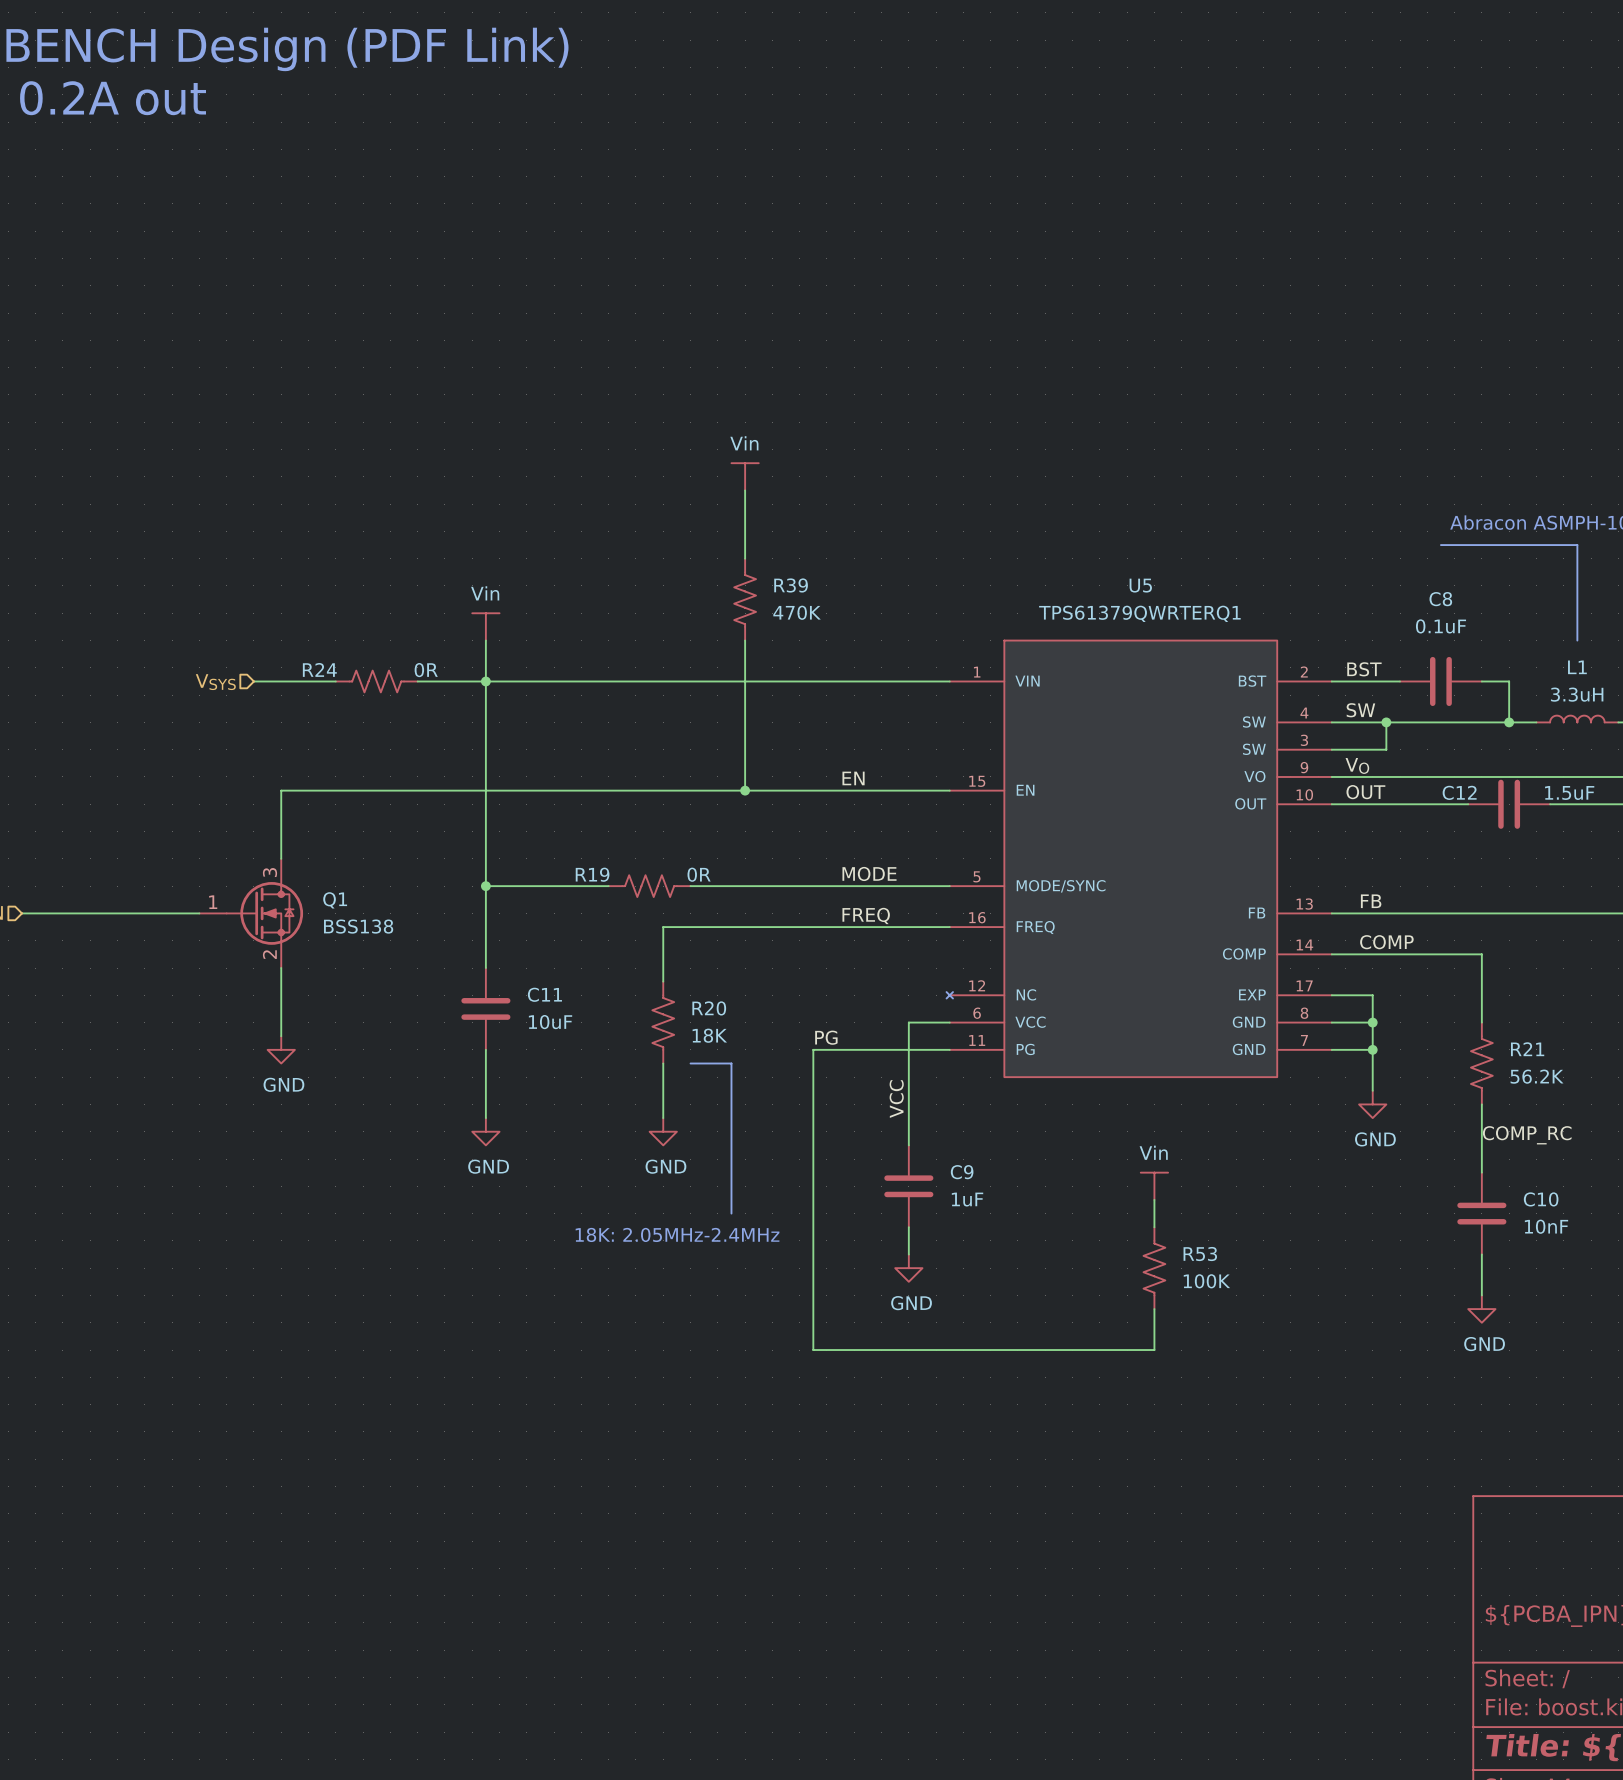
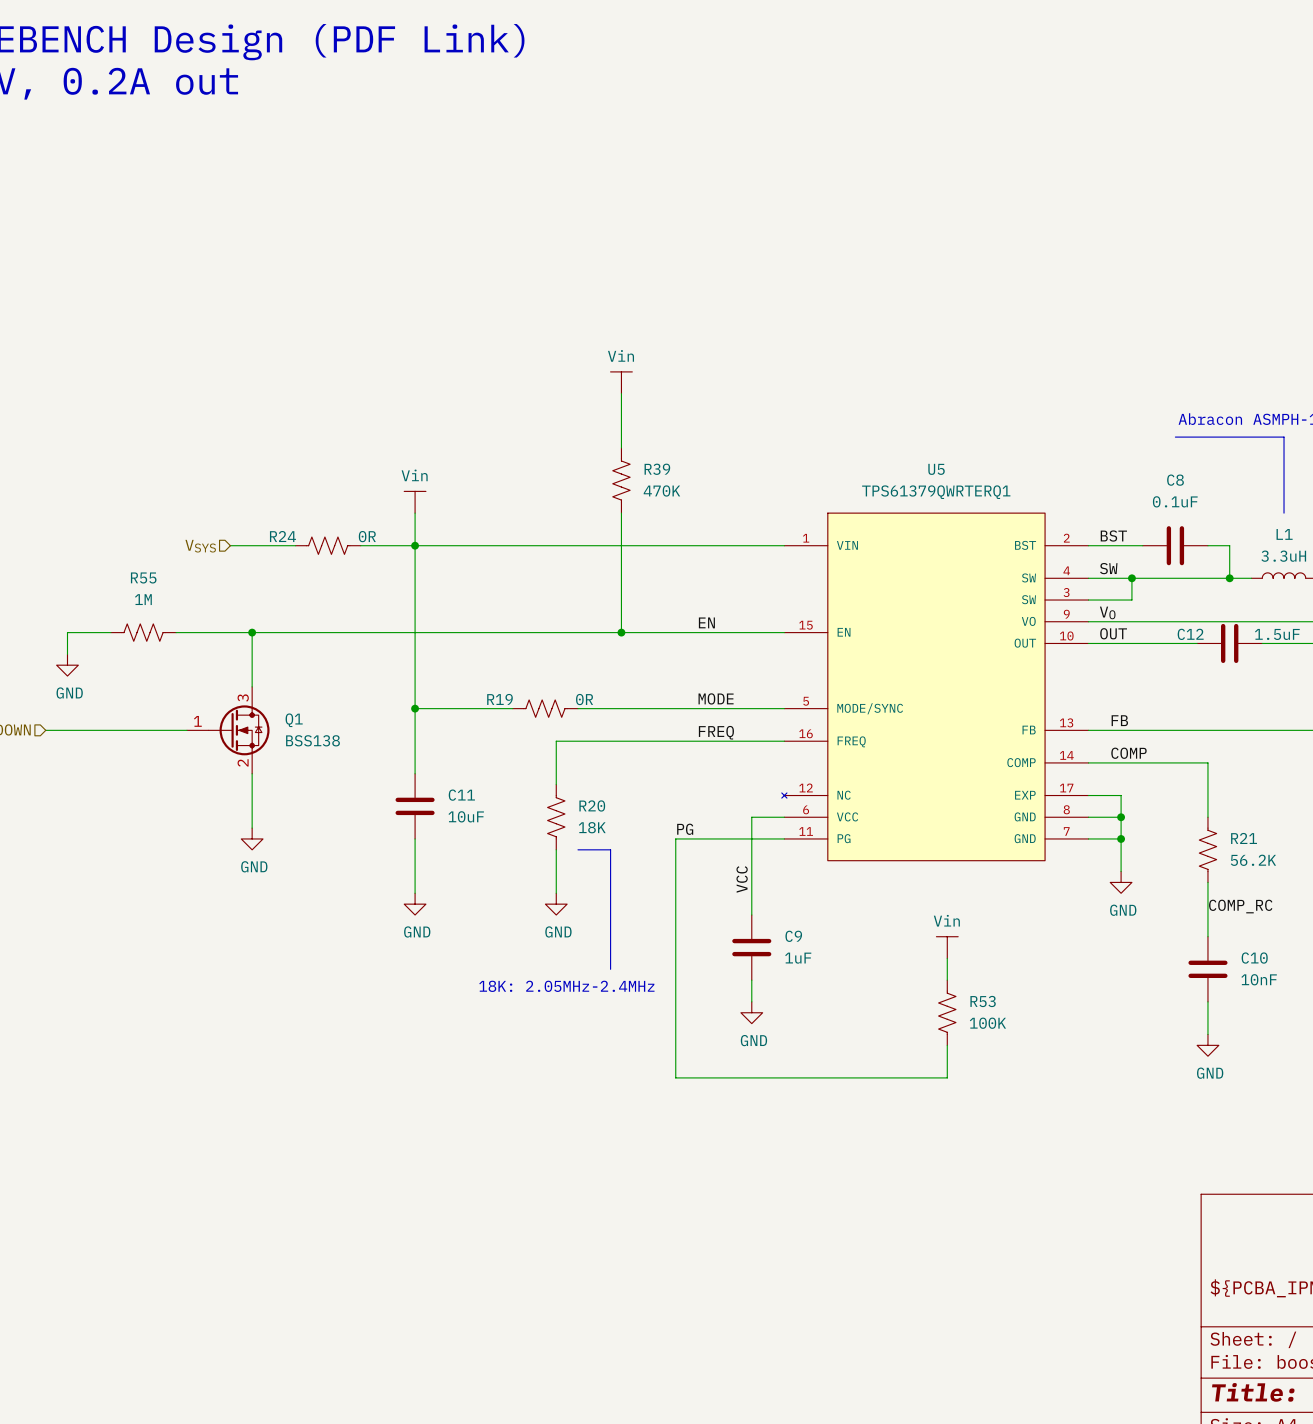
wire: none -> (110, 632) (67, 632) (67, 654)
R55: none -> 1M (143, 632)
wire: none -> (176, 632) (252, 632)
junction: none -> (252, 632)
power symbol: none -> GND (67, 665)

